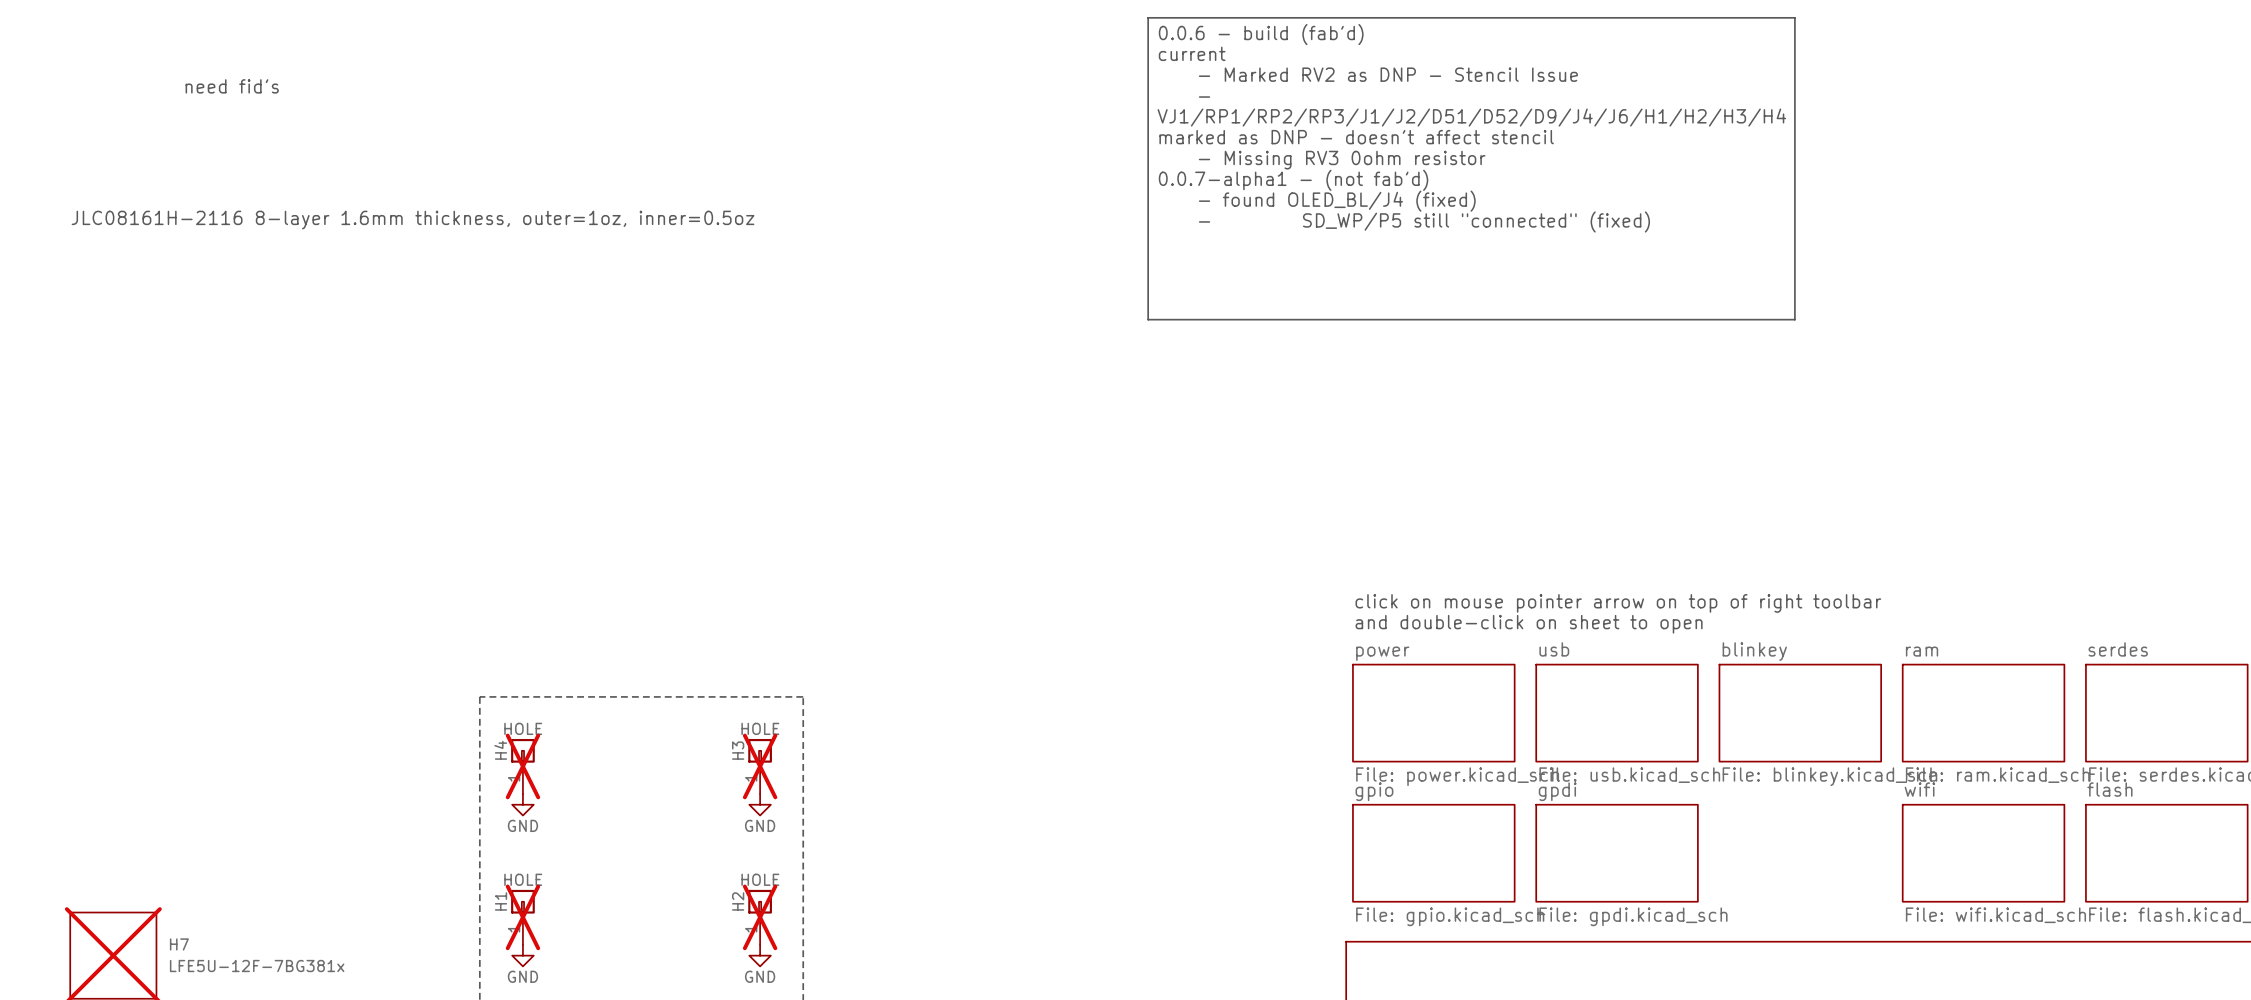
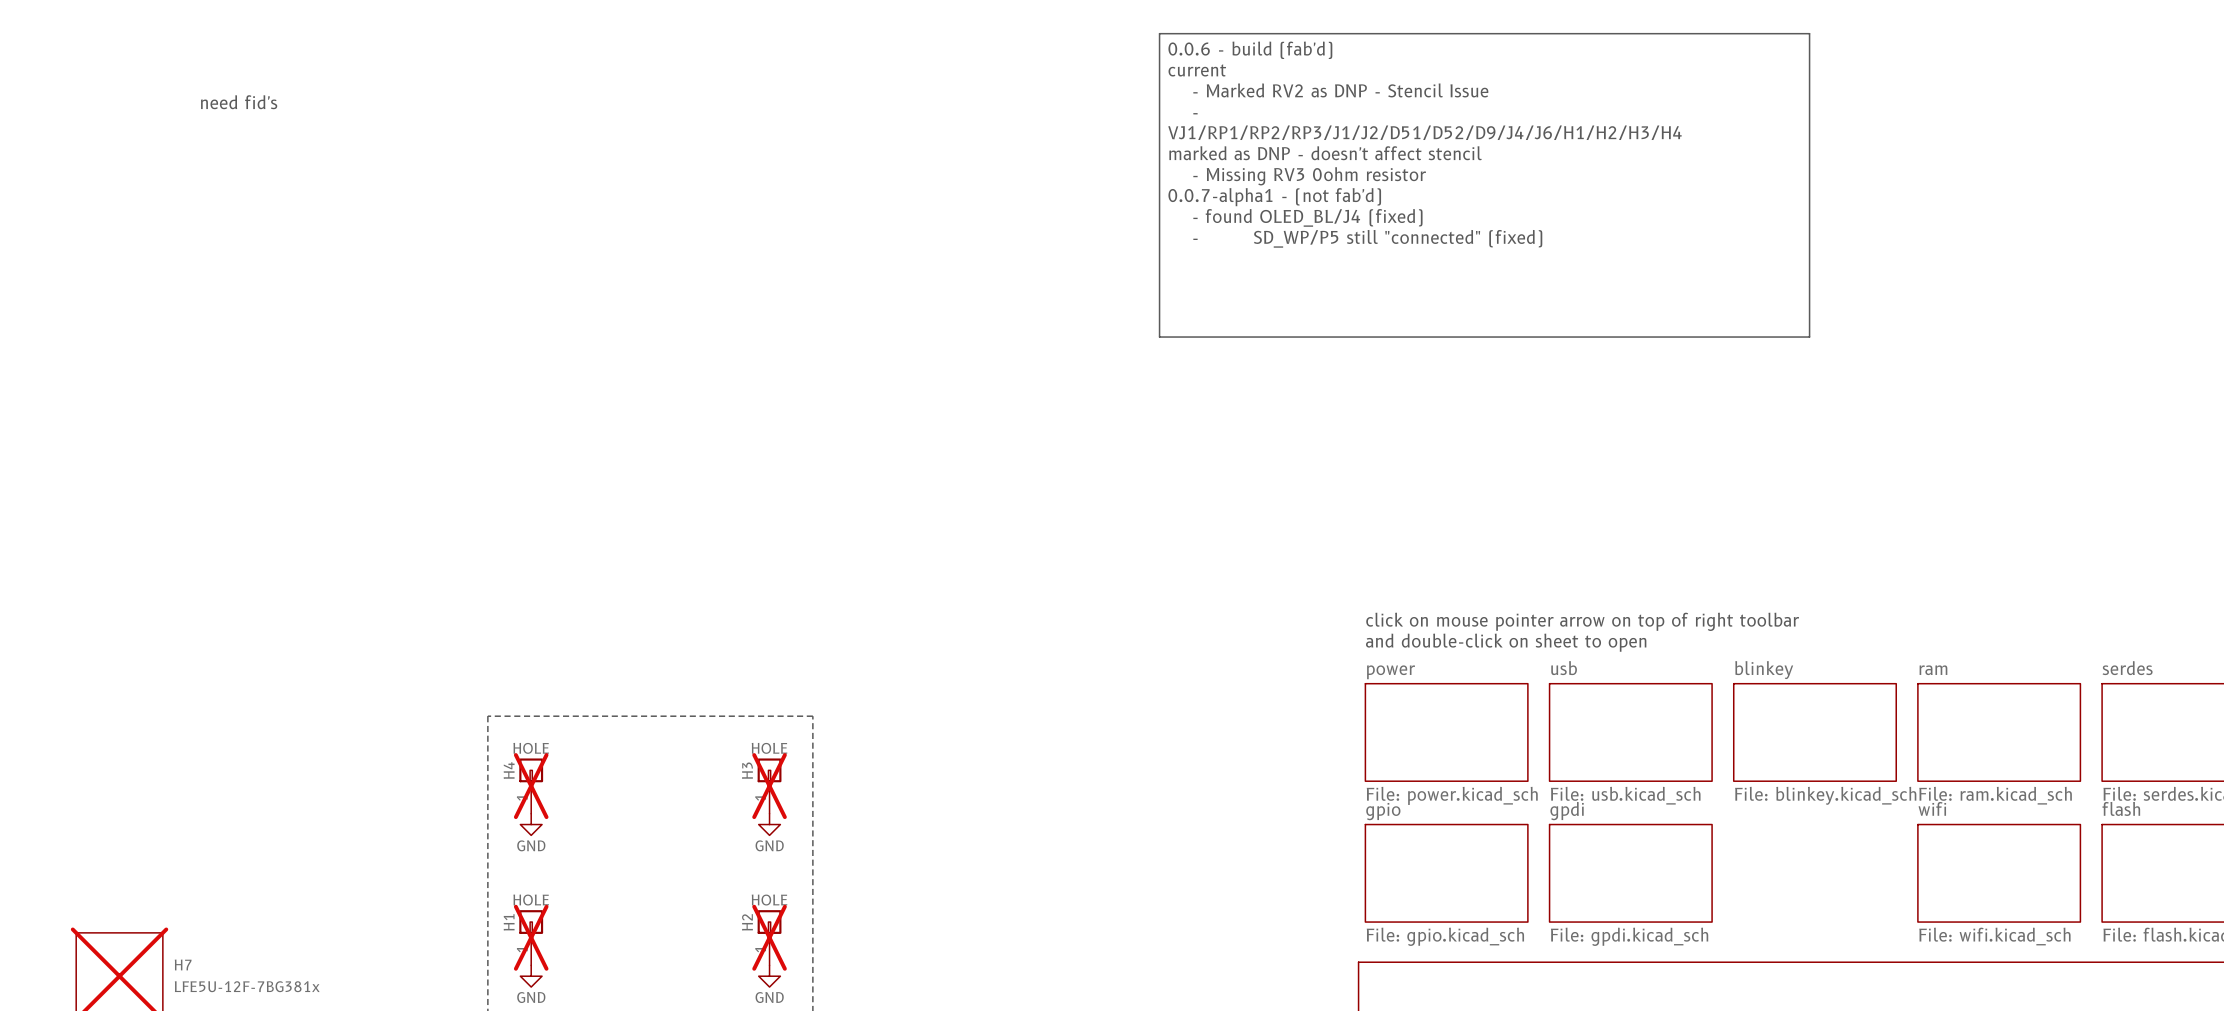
text: JLC08161H-2116 8-layer 1.6mm thickness, outer=1oz, inner=0.5oz (413, 220) -> none

